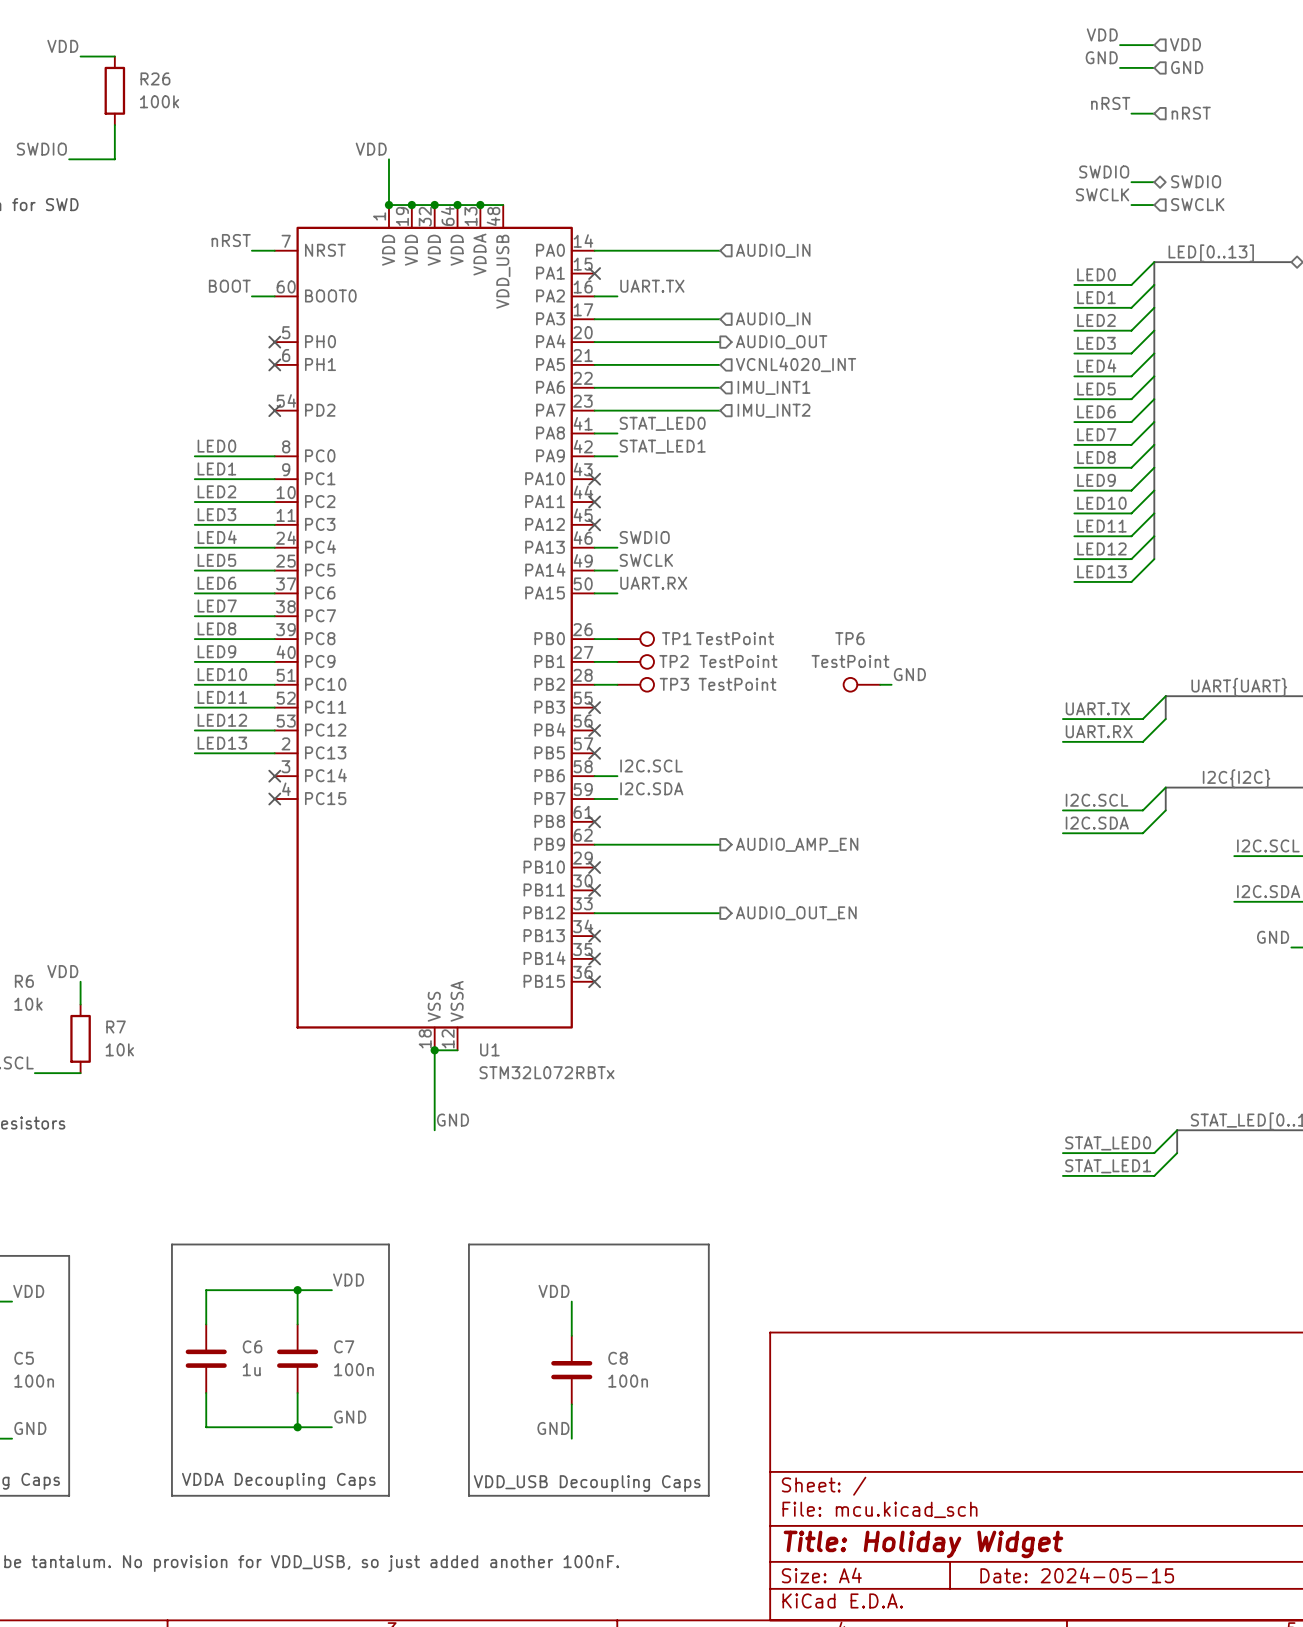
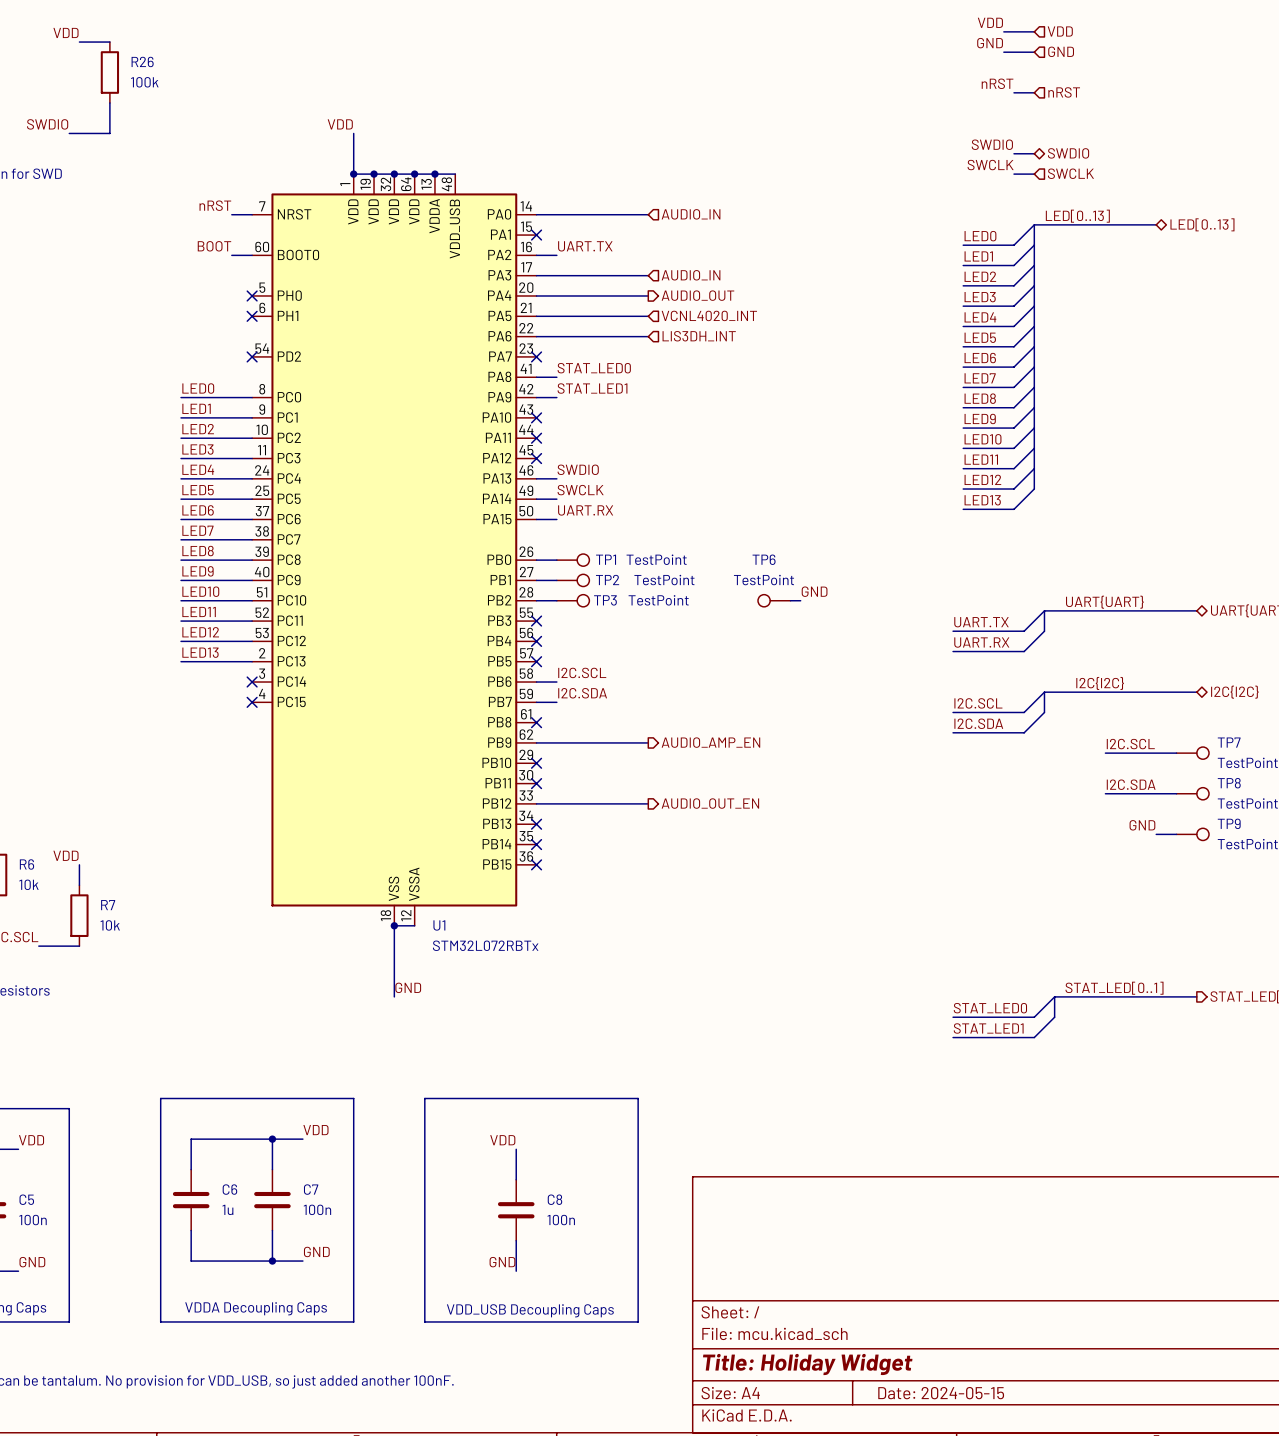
hierarchical label: IMU_INT1 (774, 387) -> LIS3DH_INT (699, 336)
wire: (594, 410) (720, 410) -> none
no-connect mark: none -> (536, 356)
hierarchical label: IMU_INT2 (774, 410) -> none

